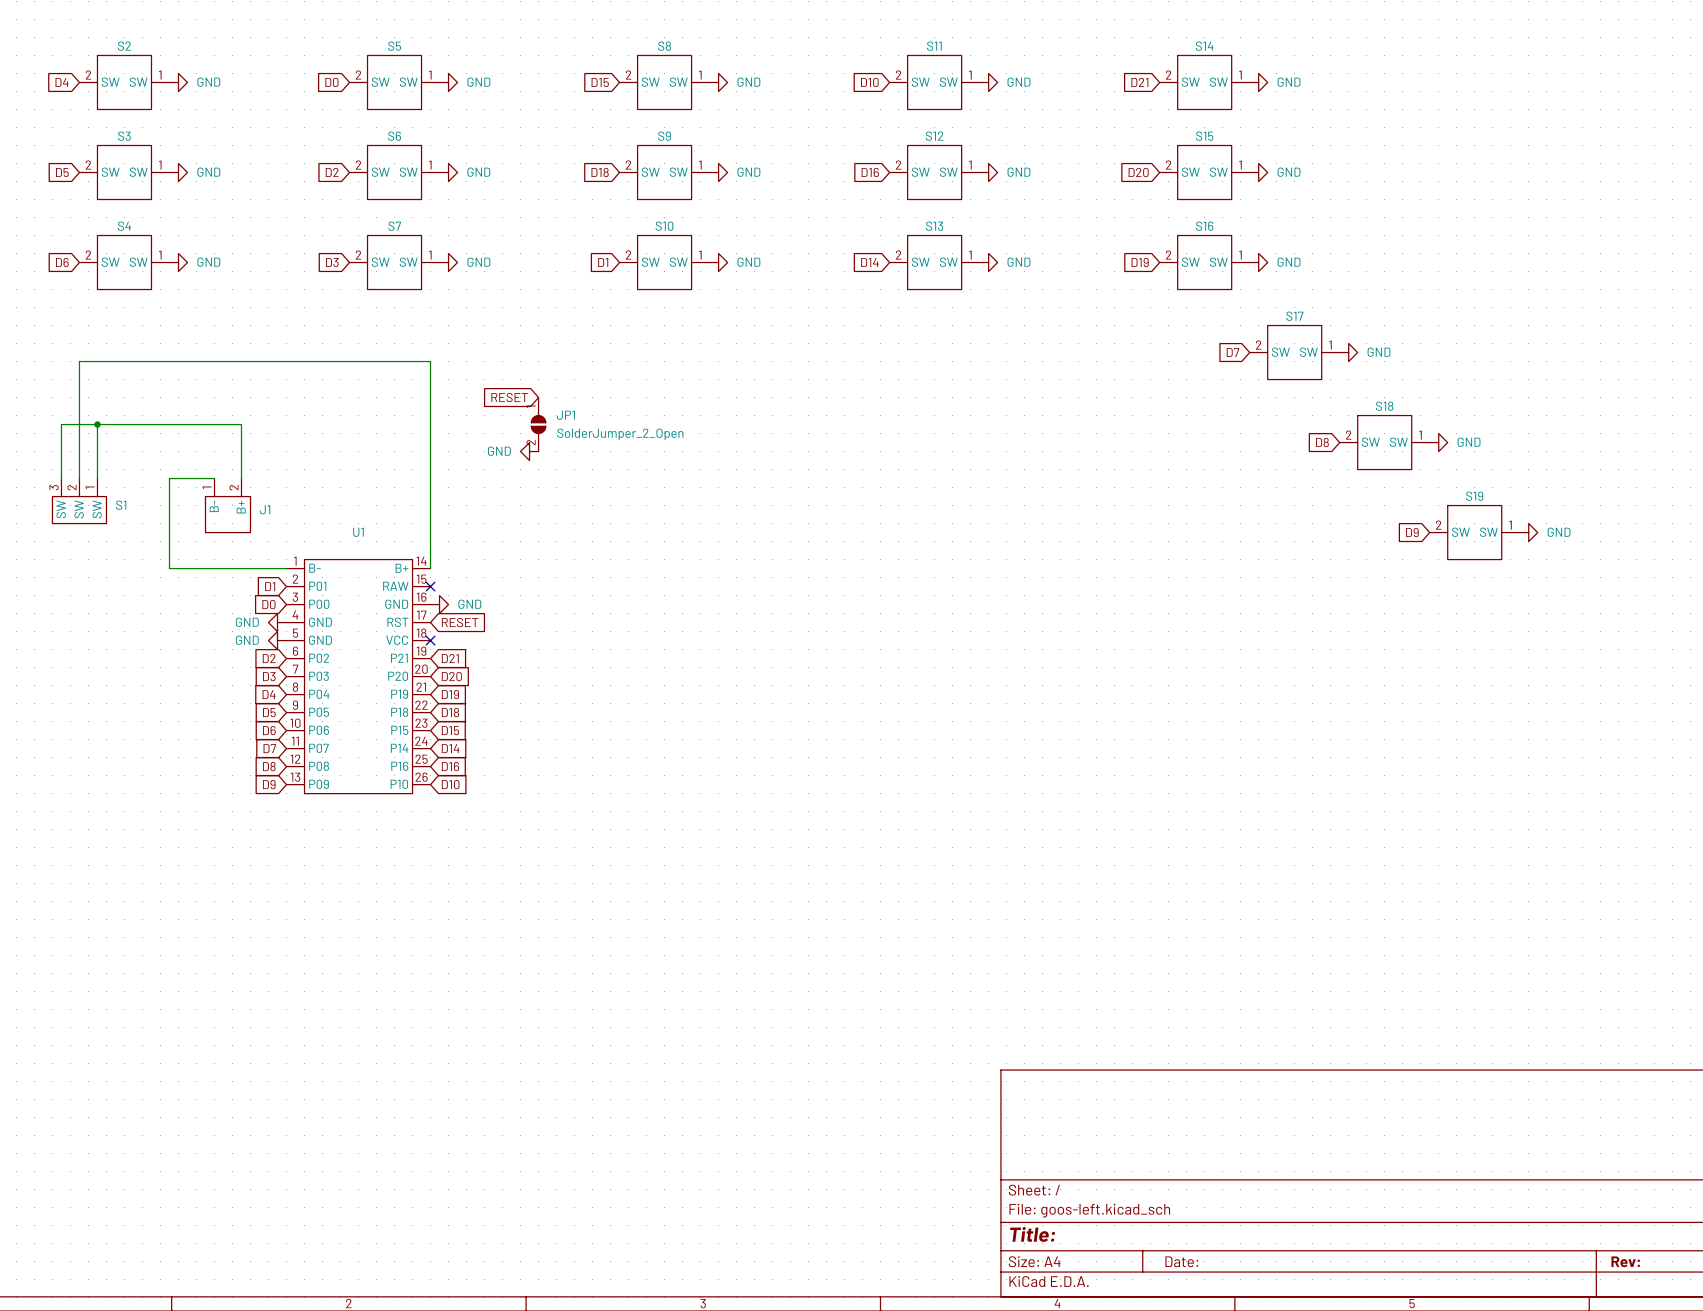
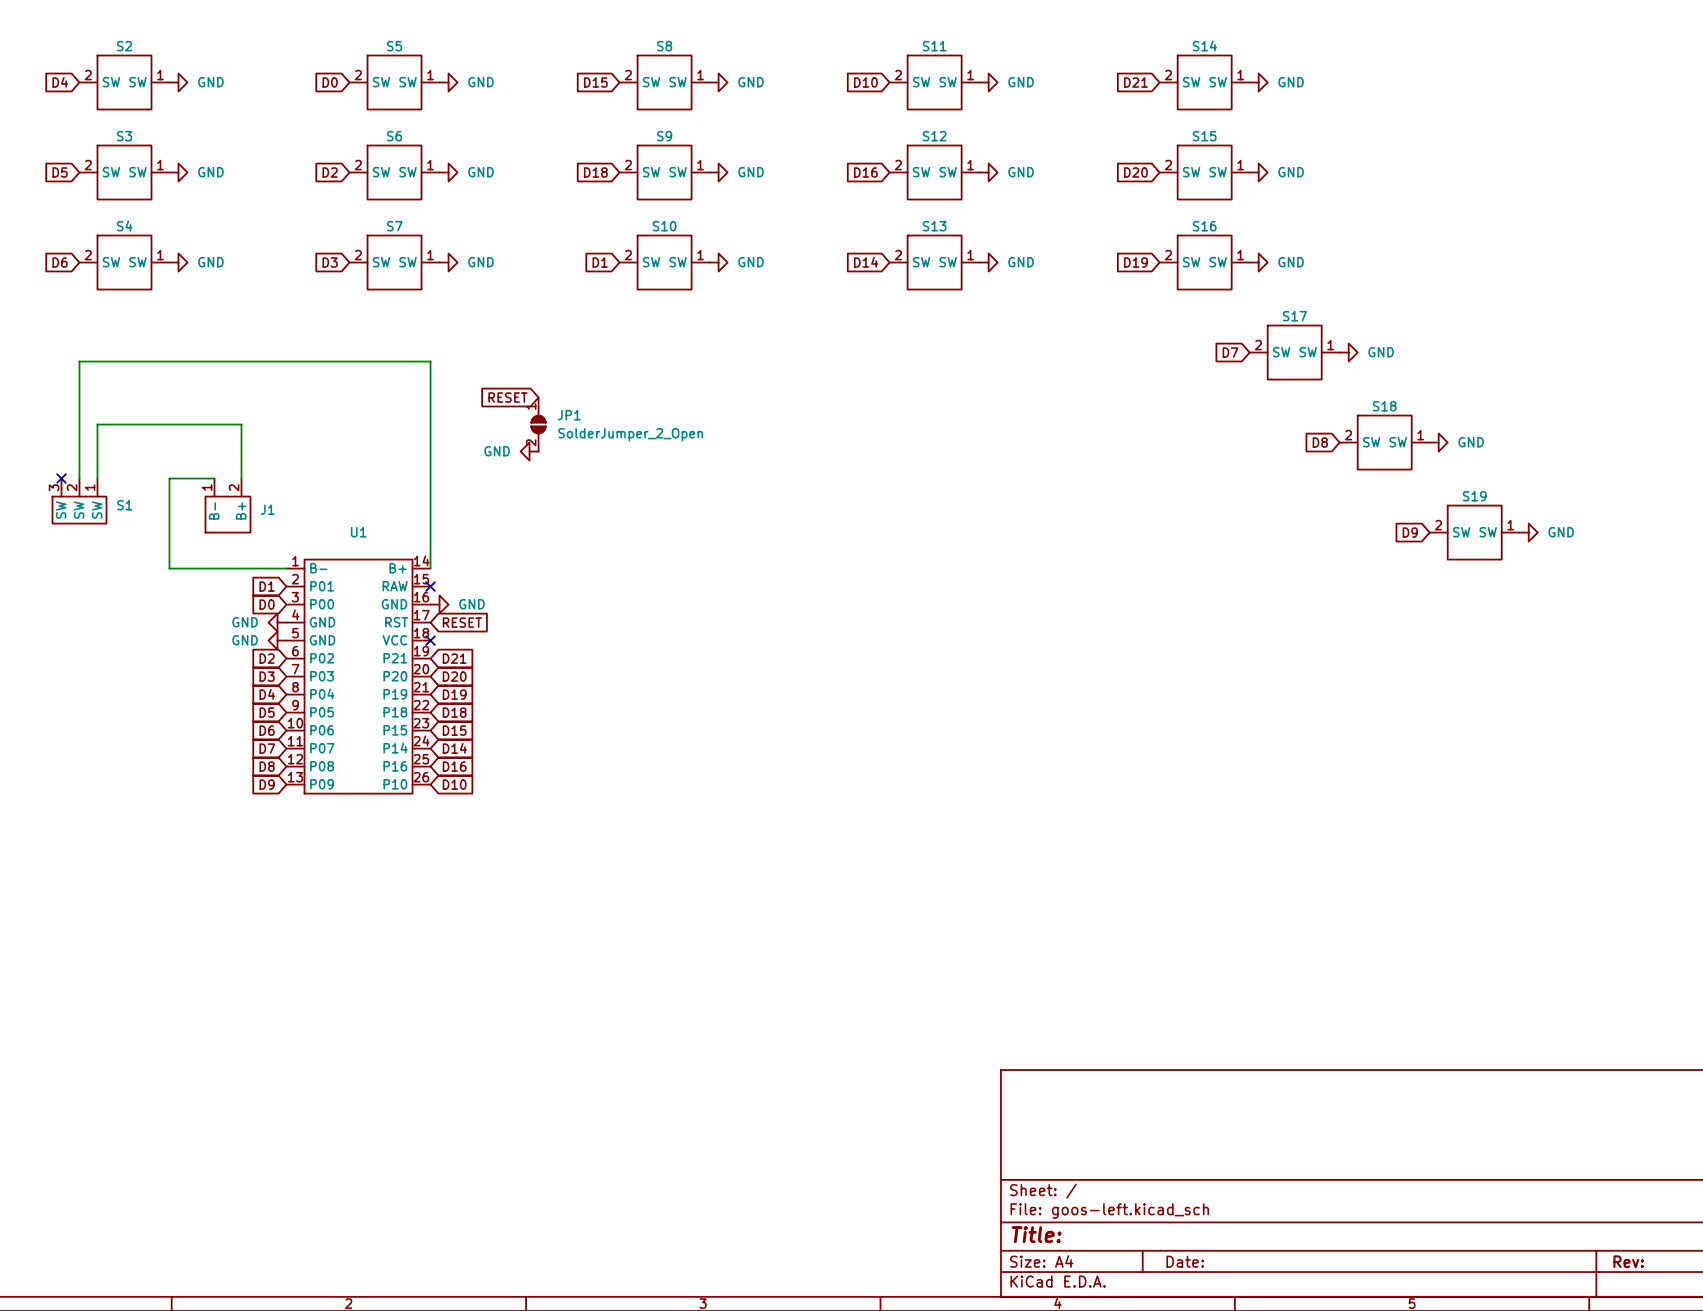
wire: (97, 424) (61, 424) (61, 478) -> none
junction: (97, 424) -> none
no-connect mark: none -> (61, 478)

